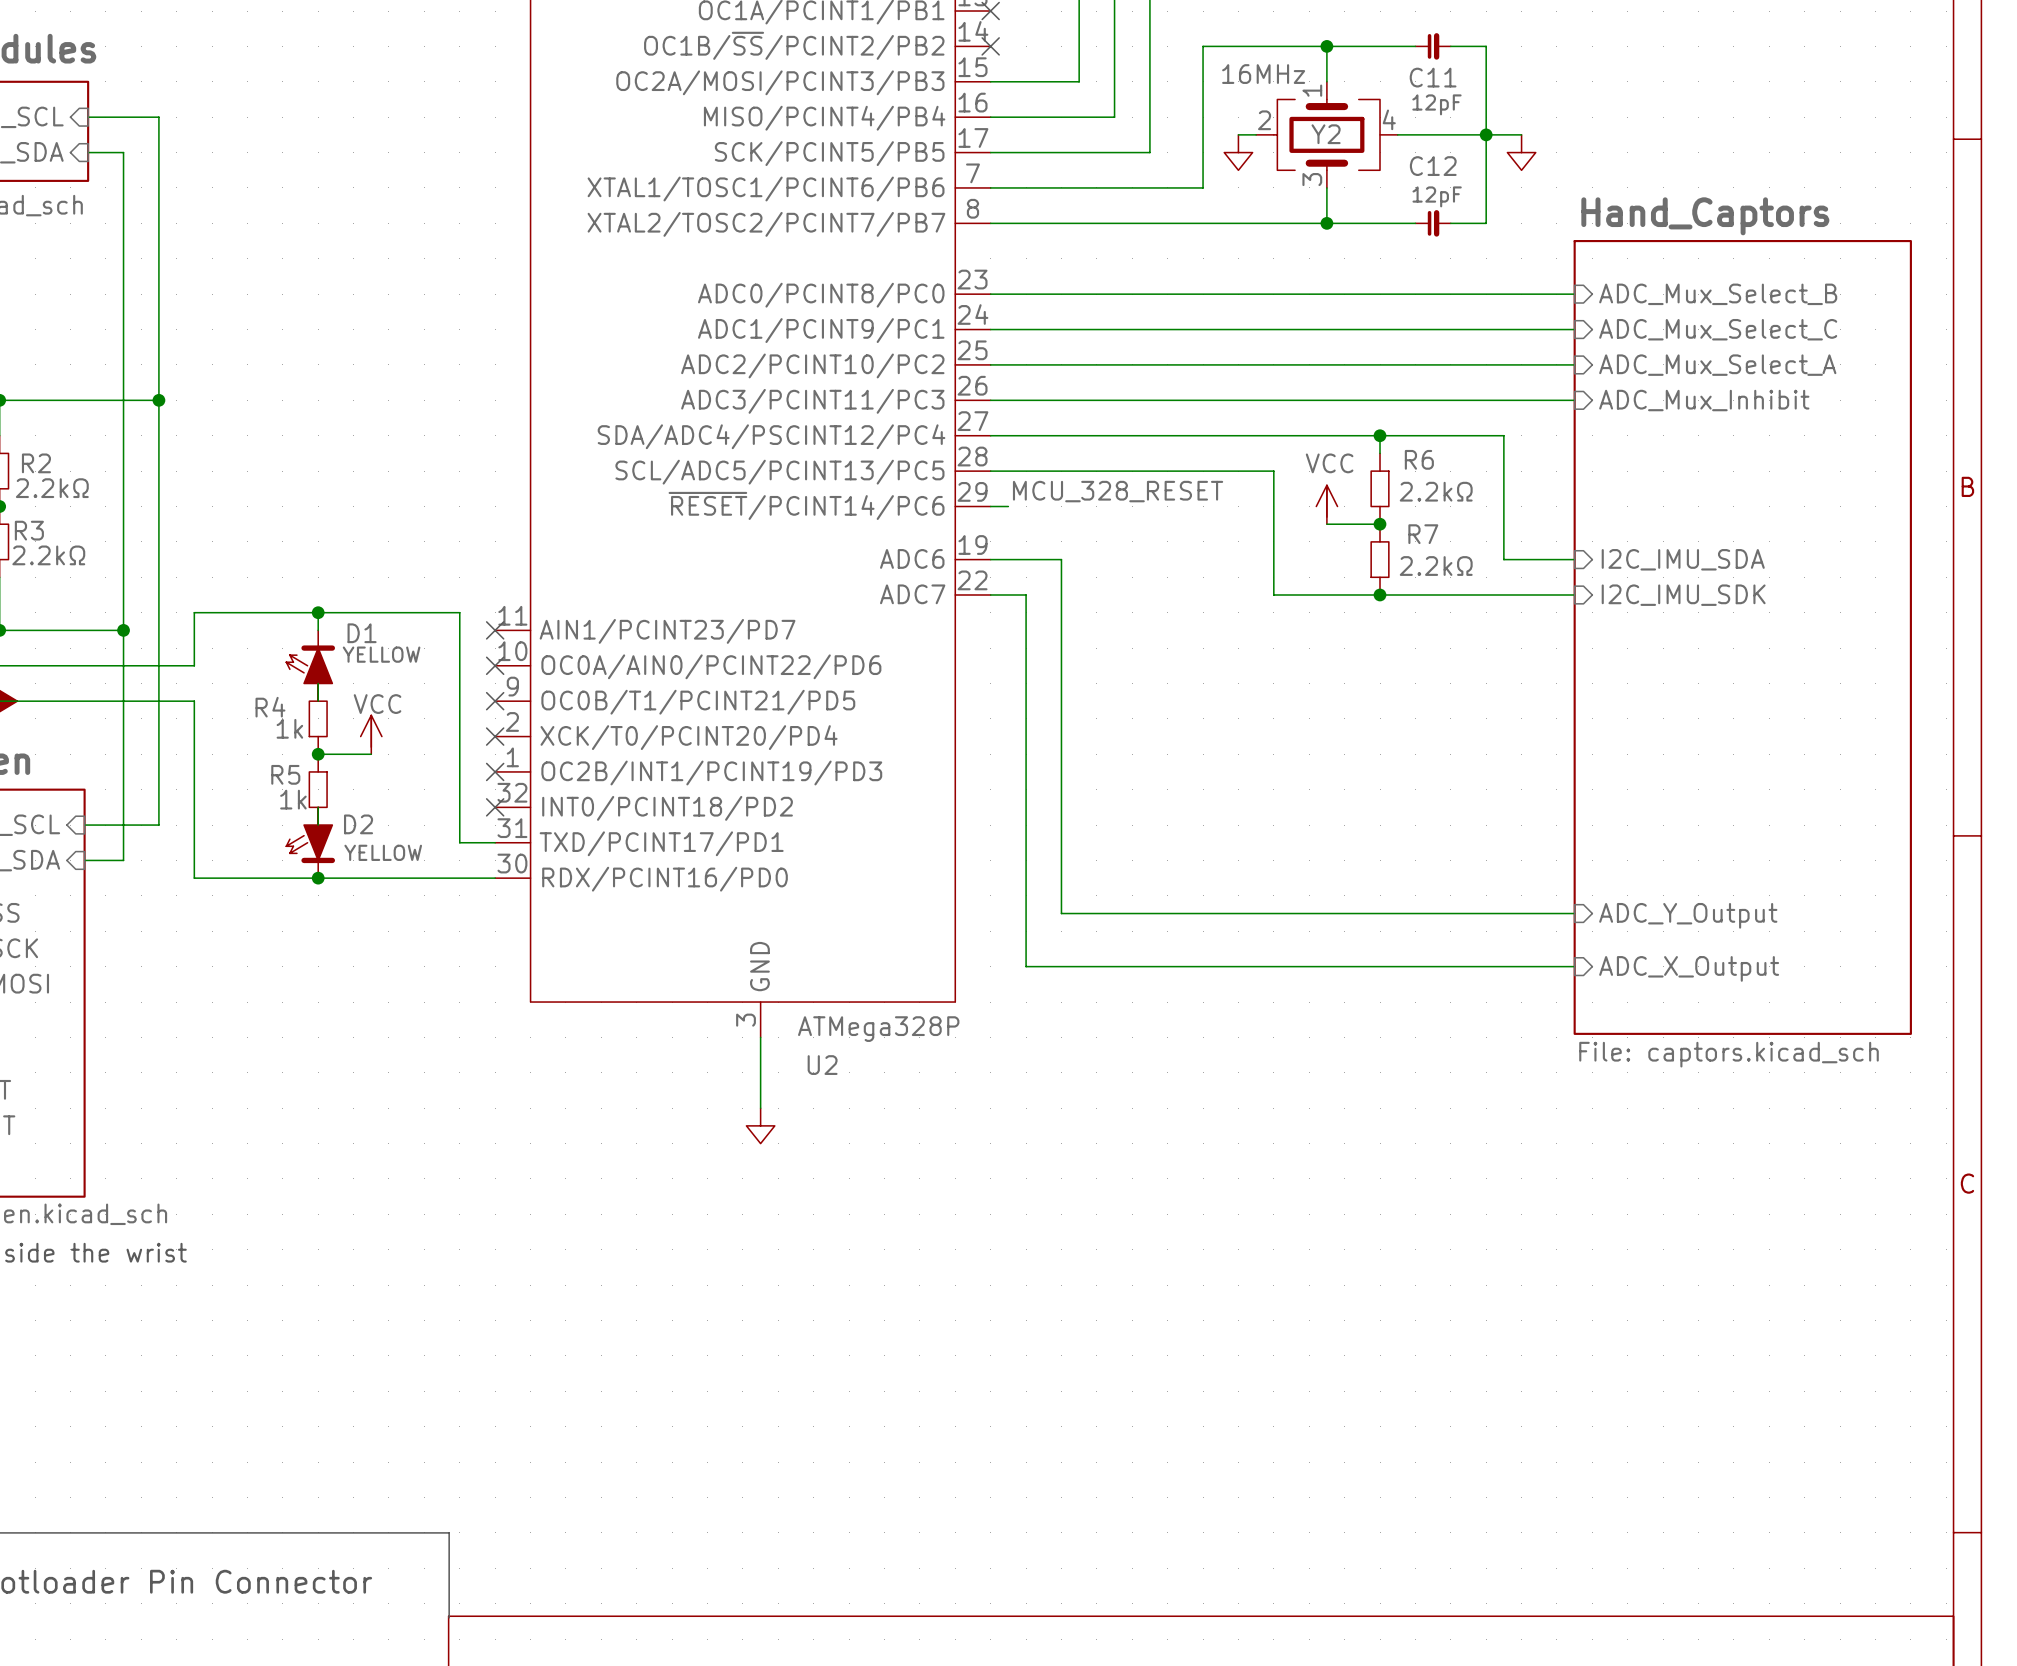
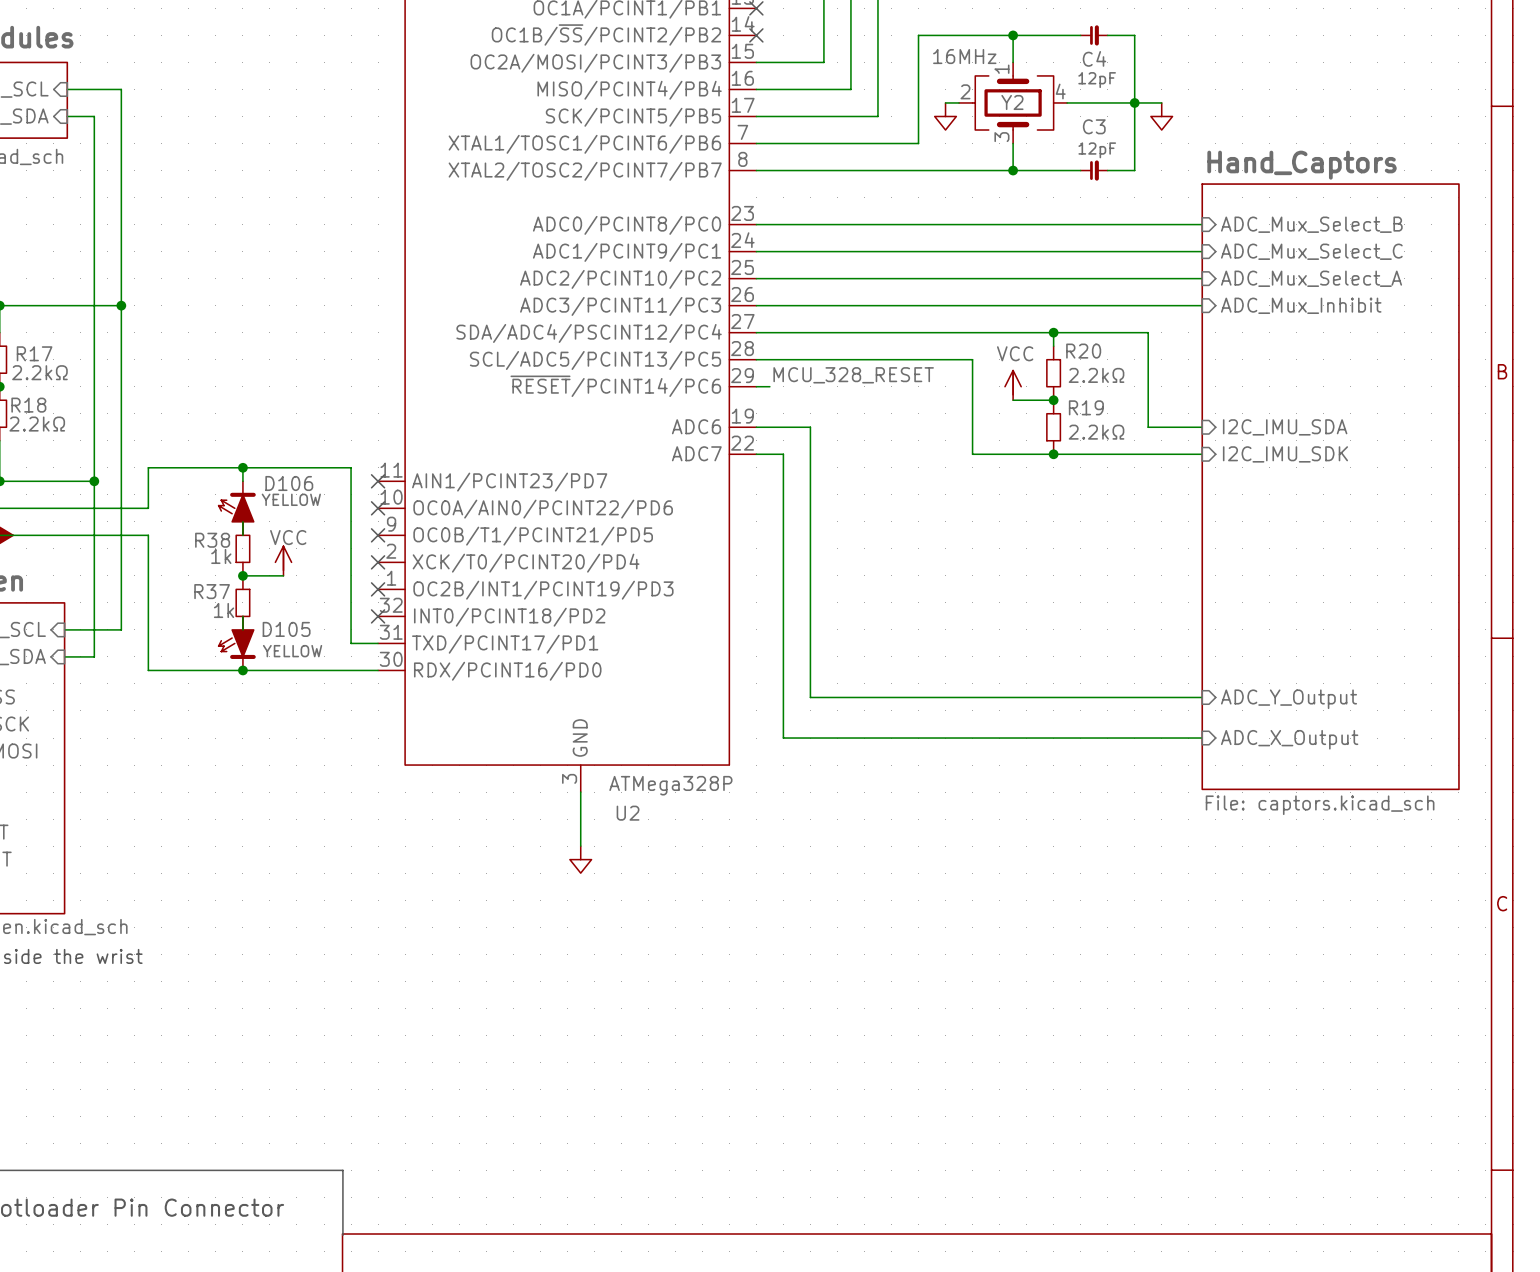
C11 name: C11 (1433, 77) -> C4 (1094, 58)
C12 name: C12 (1433, 166) -> C3 (1094, 126)
R6 name: R6 (1419, 459) -> R20 (1083, 351)
R2 name: R2 (36, 463) -> R17 (34, 353)
R3 name: R3 (29, 530) -> R18 (28, 405)
R7 name: R7 (1423, 534) -> R19 (1086, 407)
D1 name: D1 (362, 633) -> D106 (289, 483)
R4 name: R4 (270, 707) -> R38 (212, 540)
R5 name: R5 (285, 774) -> R37 (212, 591)
D2 name: D2 (358, 824) -> D105 (286, 629)

